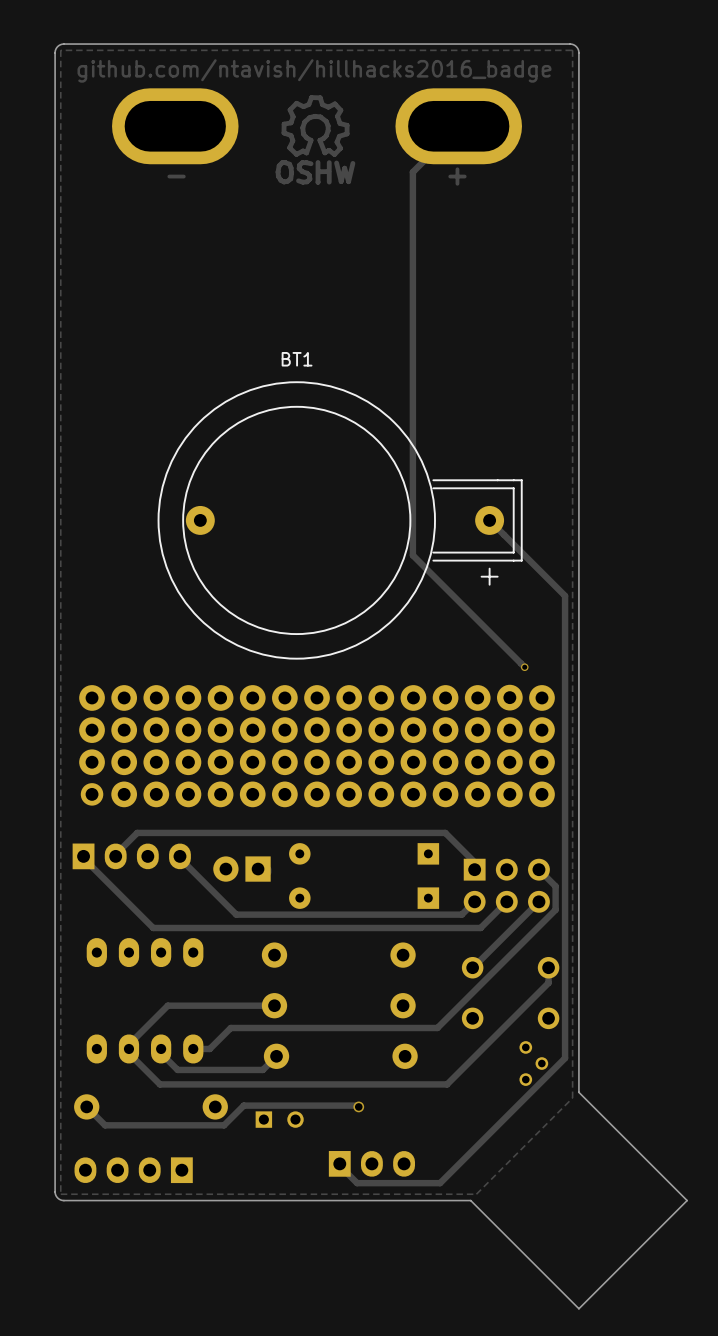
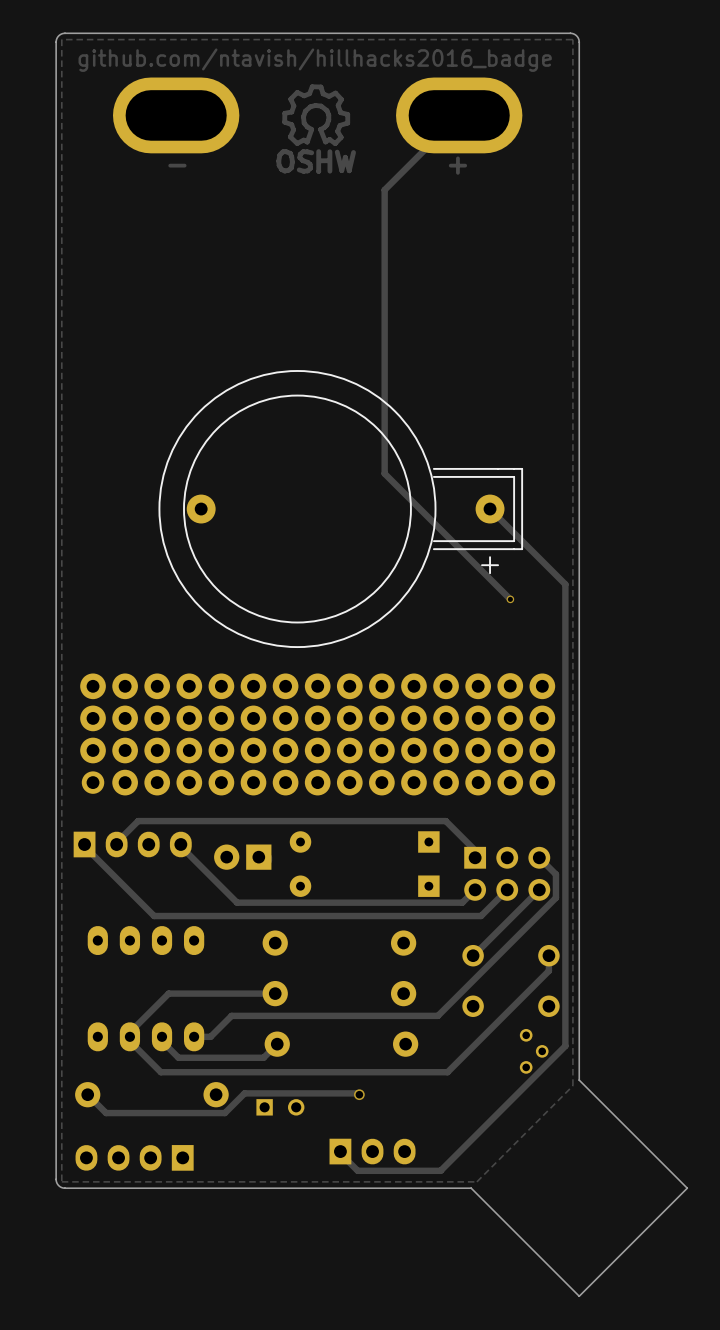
track: (412, 172) (412, 555) (524, 667) -> (413, 161) (384, 189) (384, 473) (510, 599)
BT1 name: BT1 (297, 359) -> none
via position: (524, 667) -> (510, 599)

